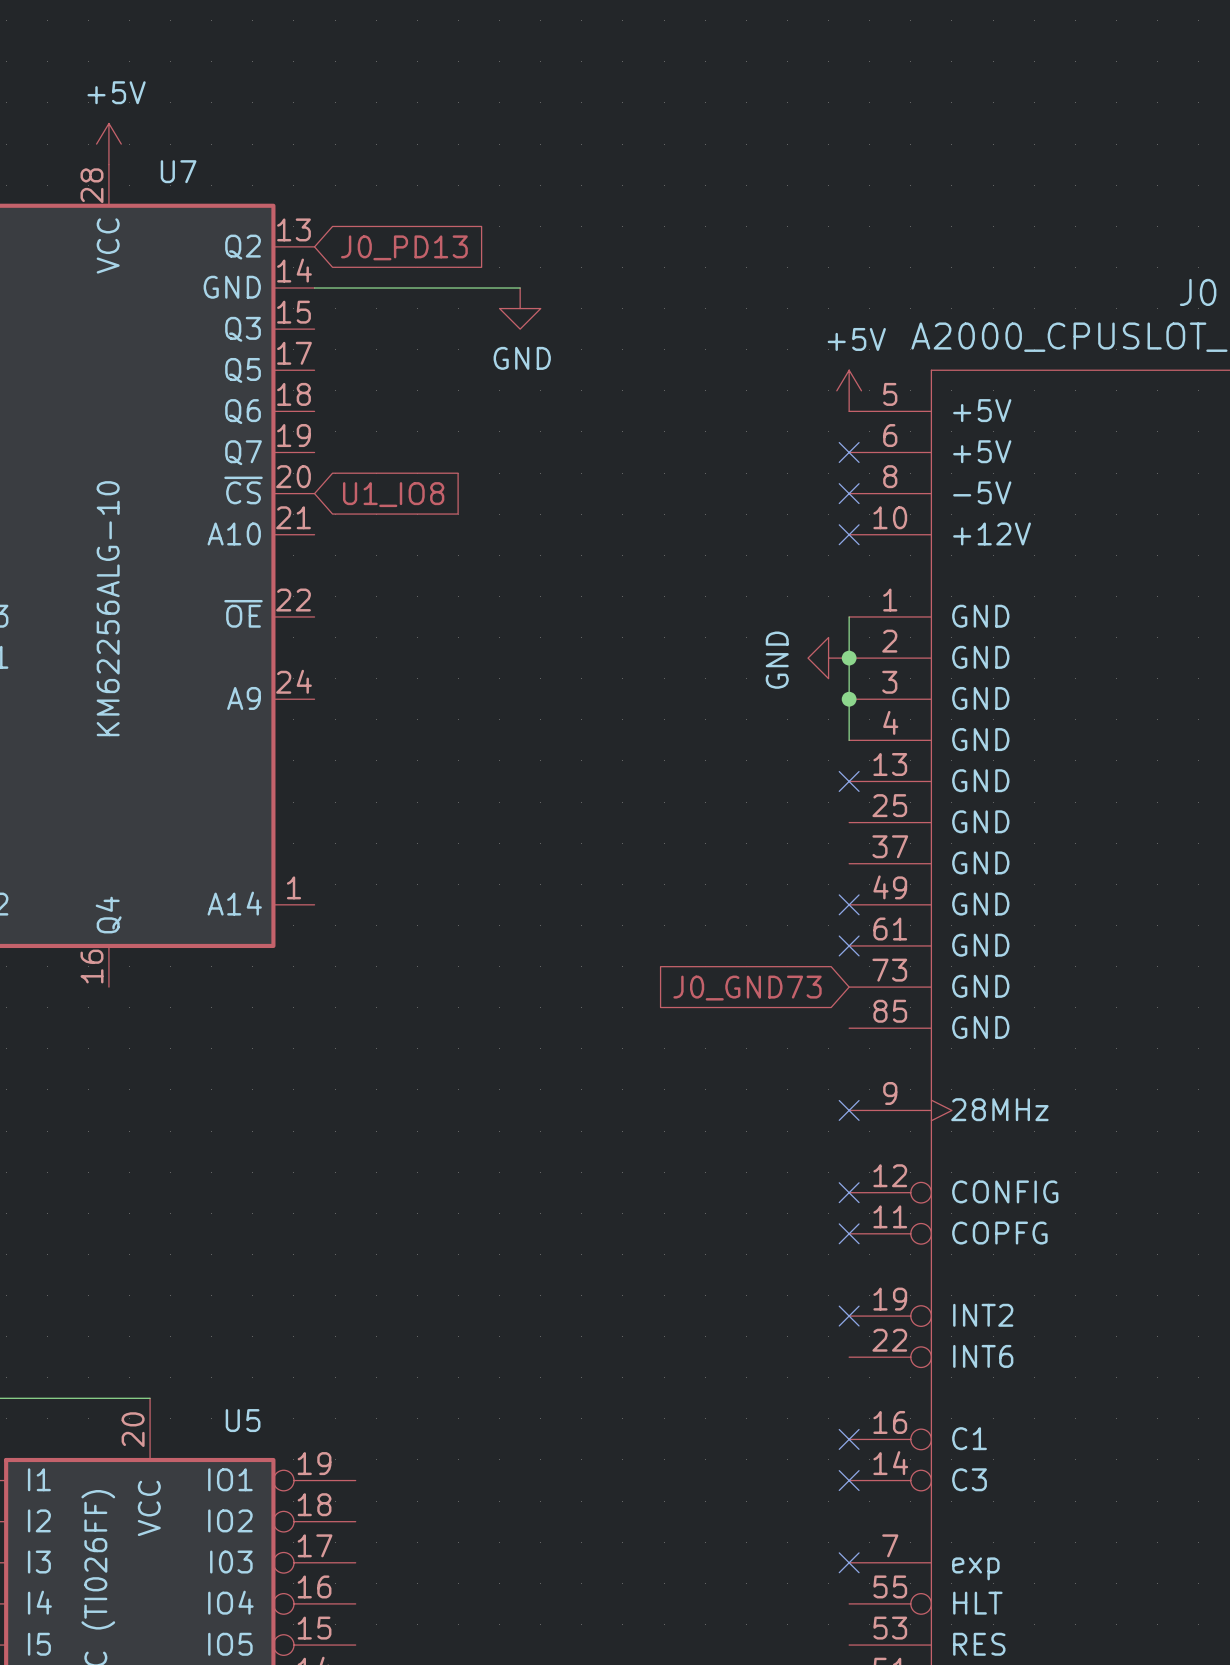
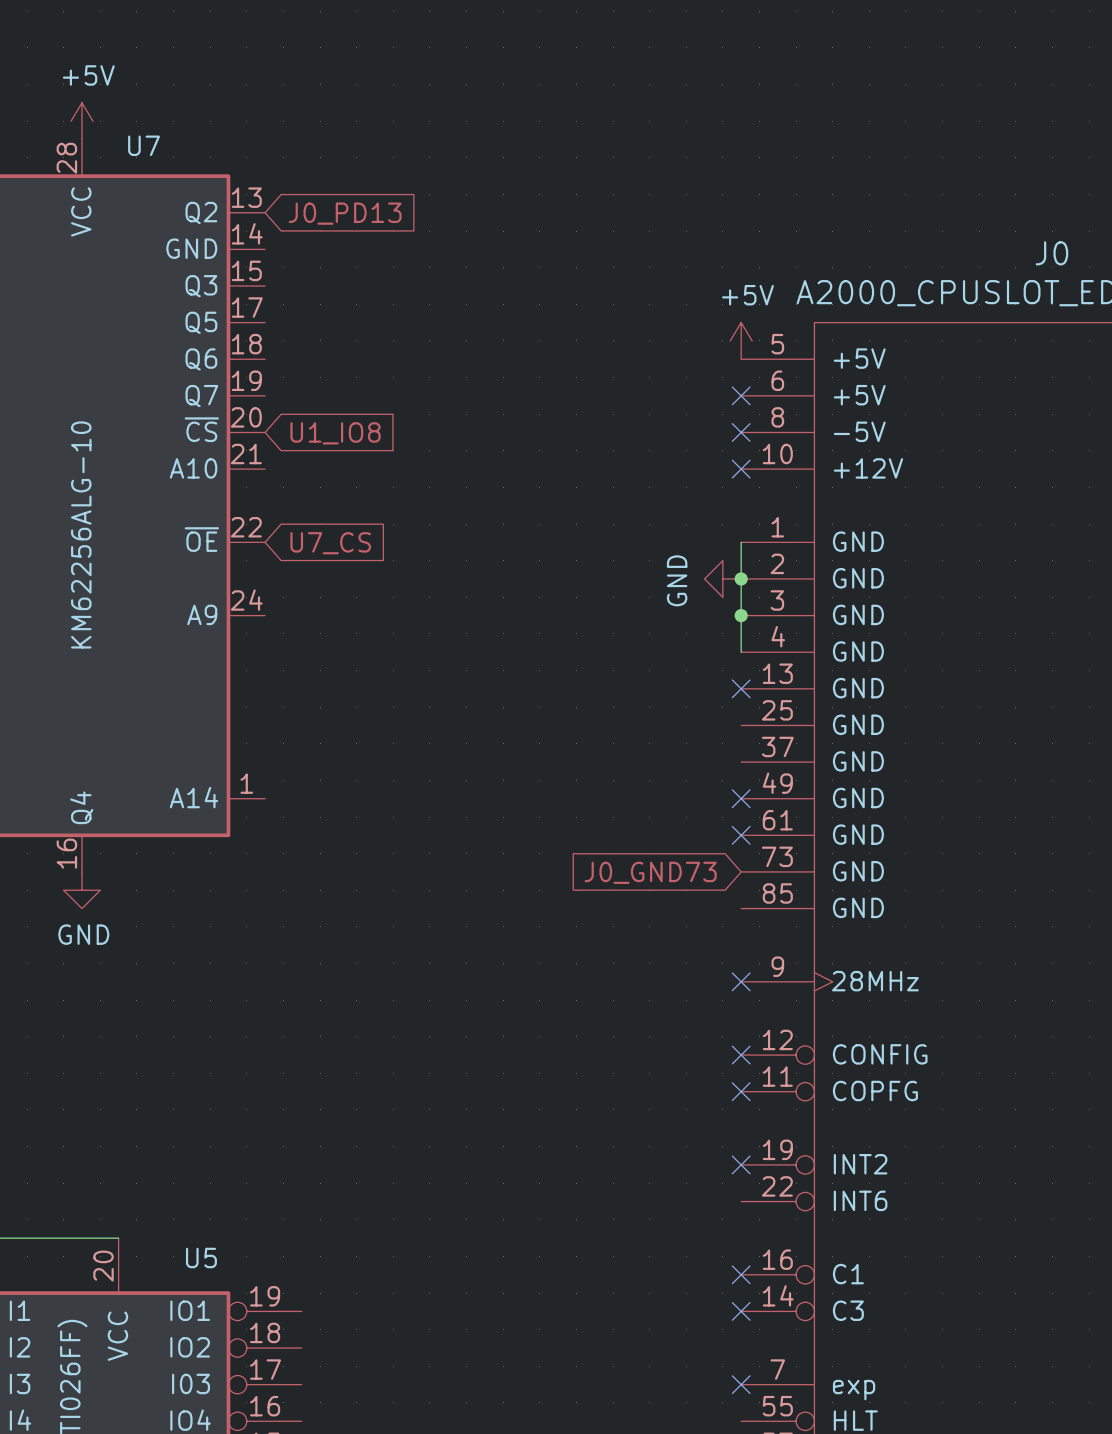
wire: (314, 288) (520, 288) -> none
power symbol: GND (520, 308) -> none
global label: none -> U7_CS (330, 543)
power symbol: none -> GND (81, 890)

